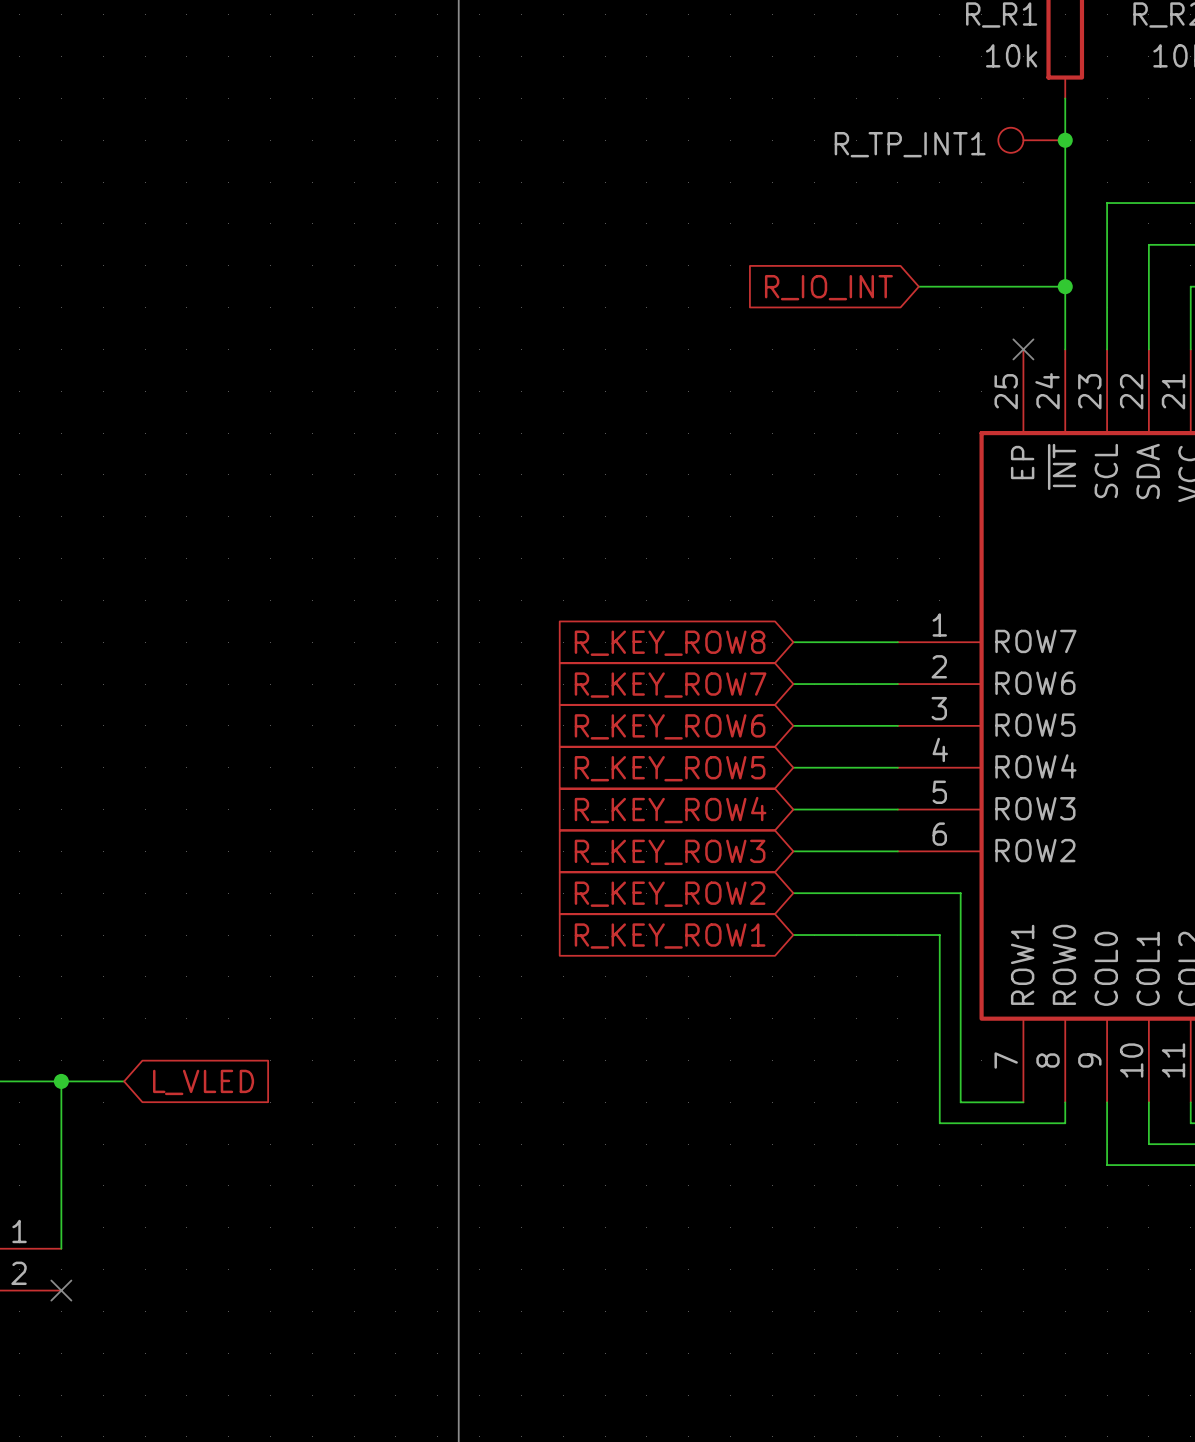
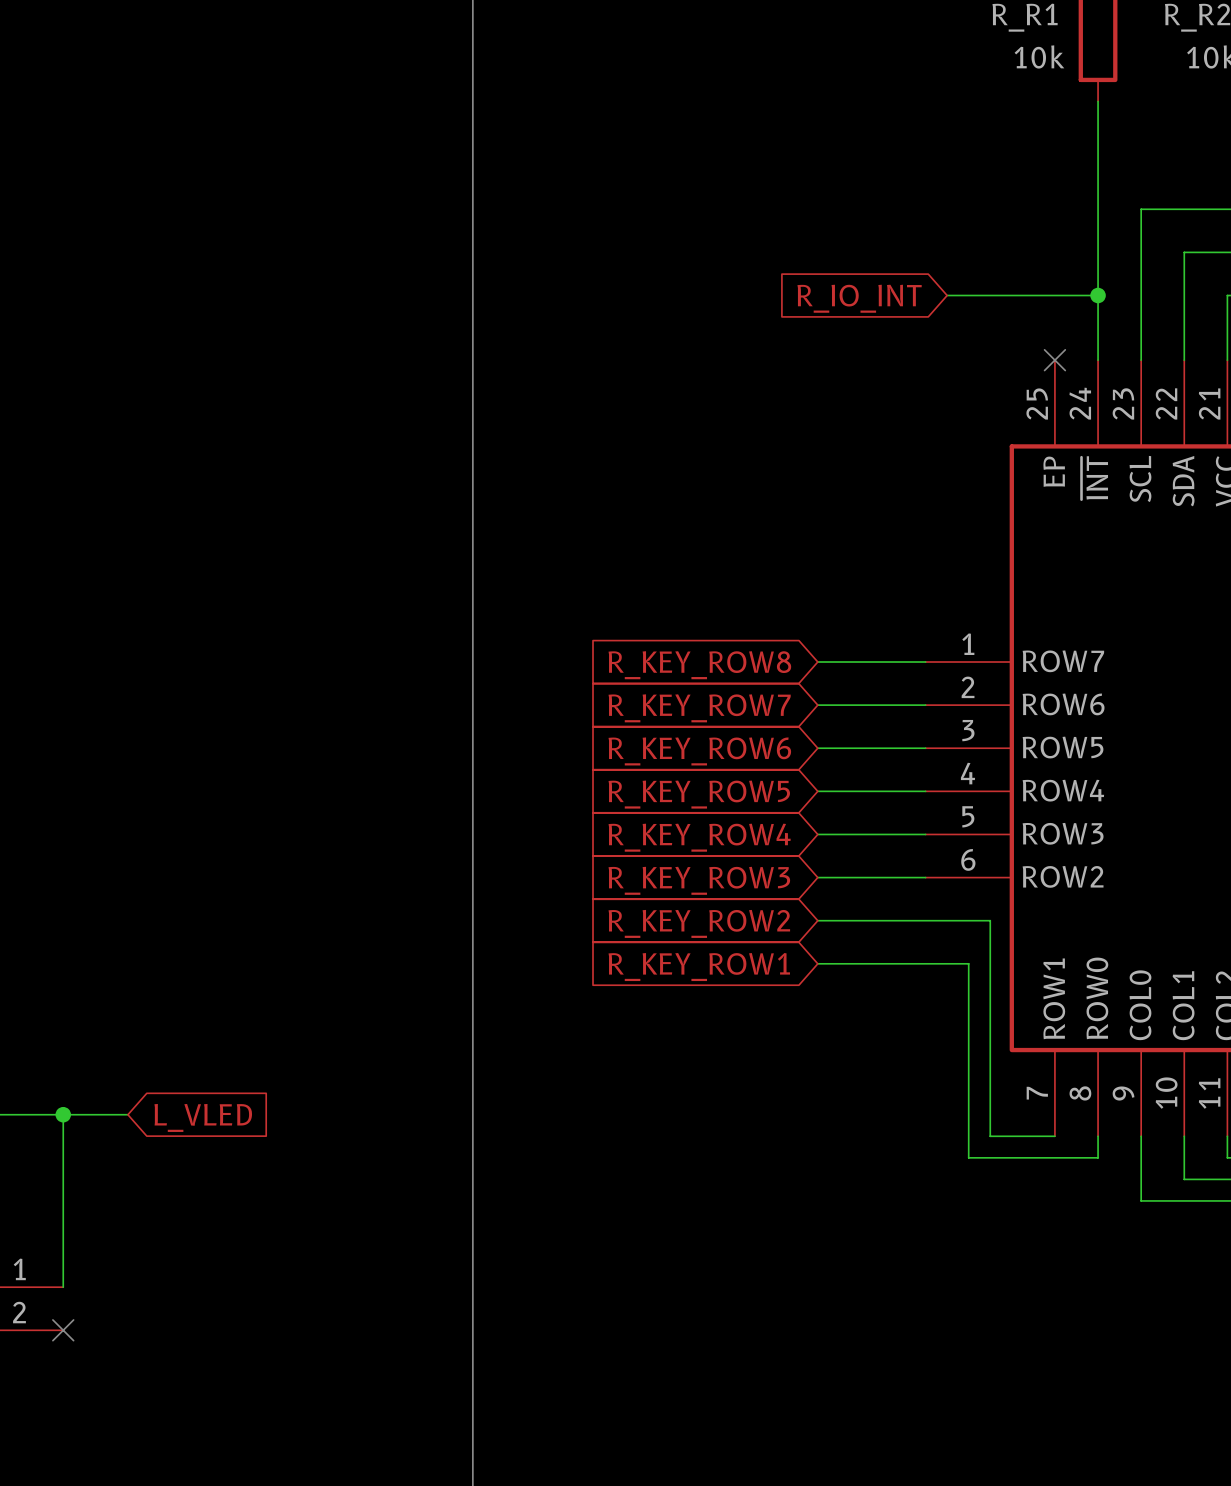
R_TP_INT1: (1031, 140) -> none
junction: (1065, 140) -> none

